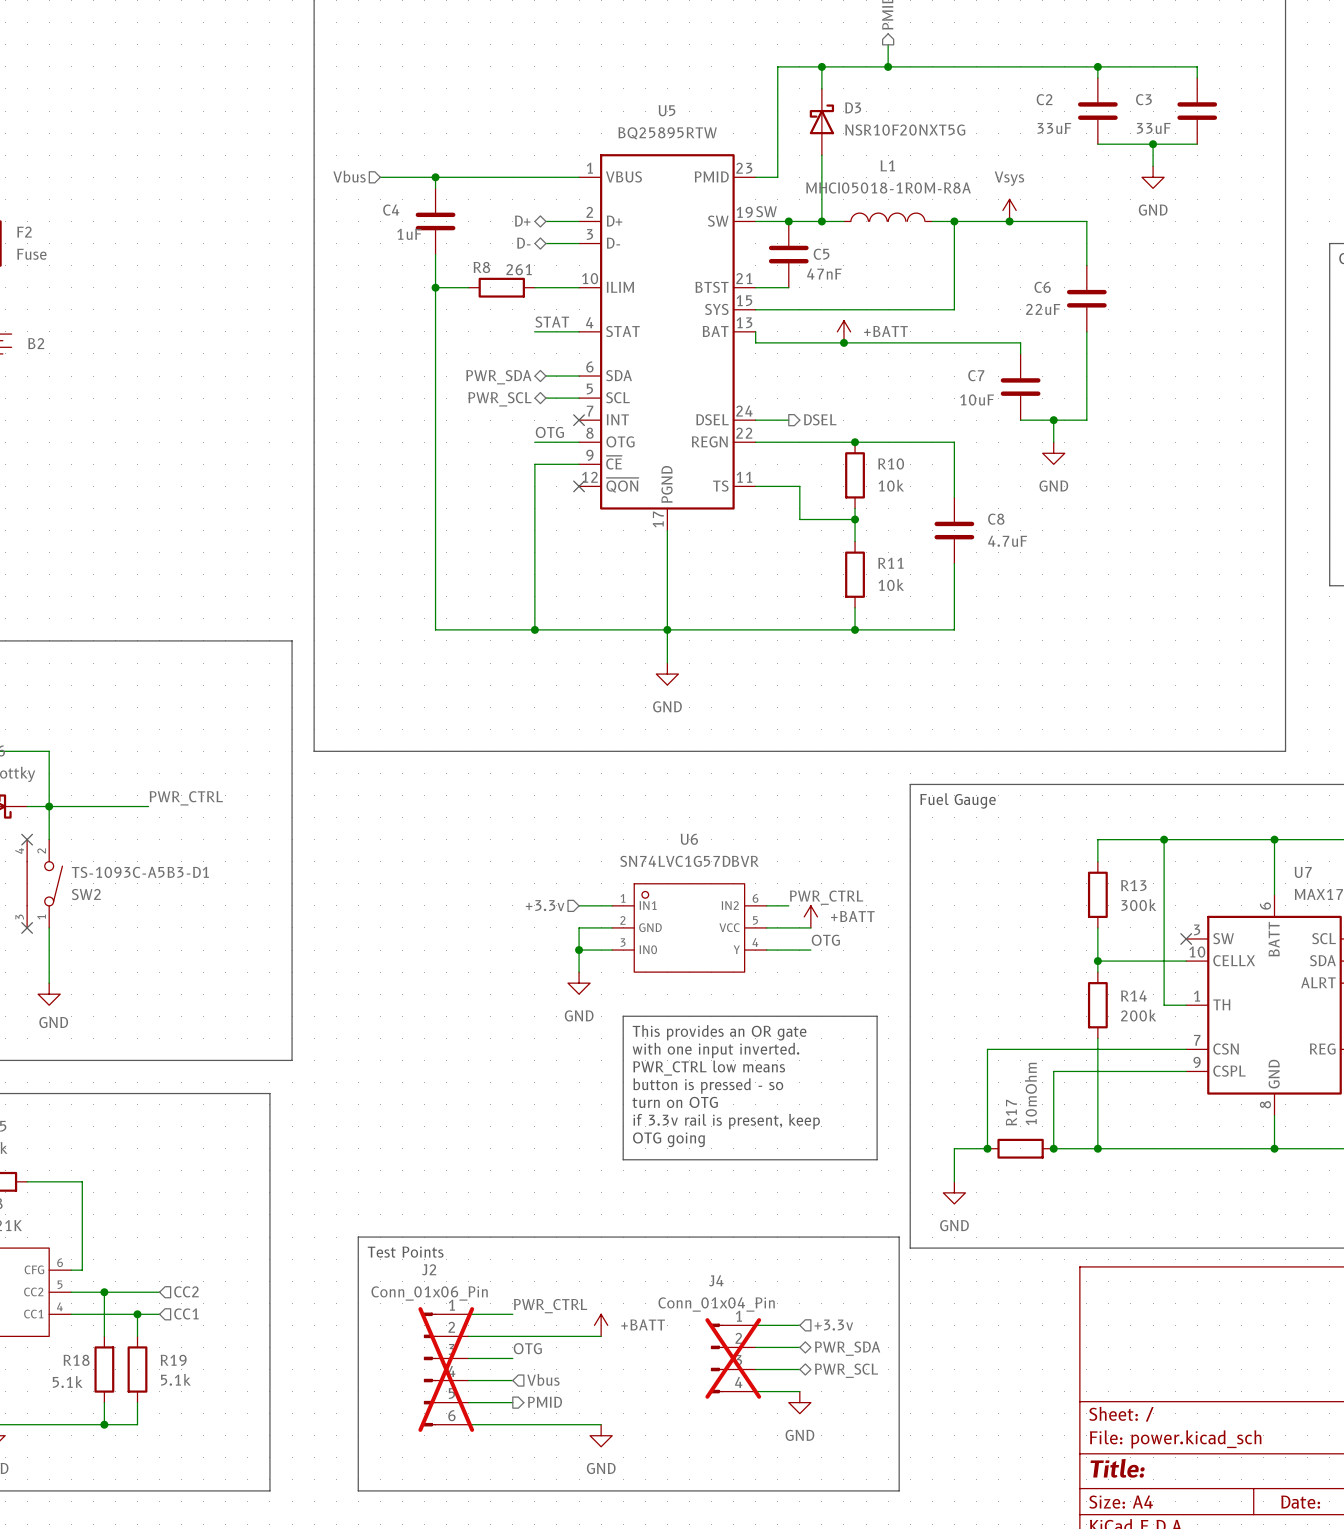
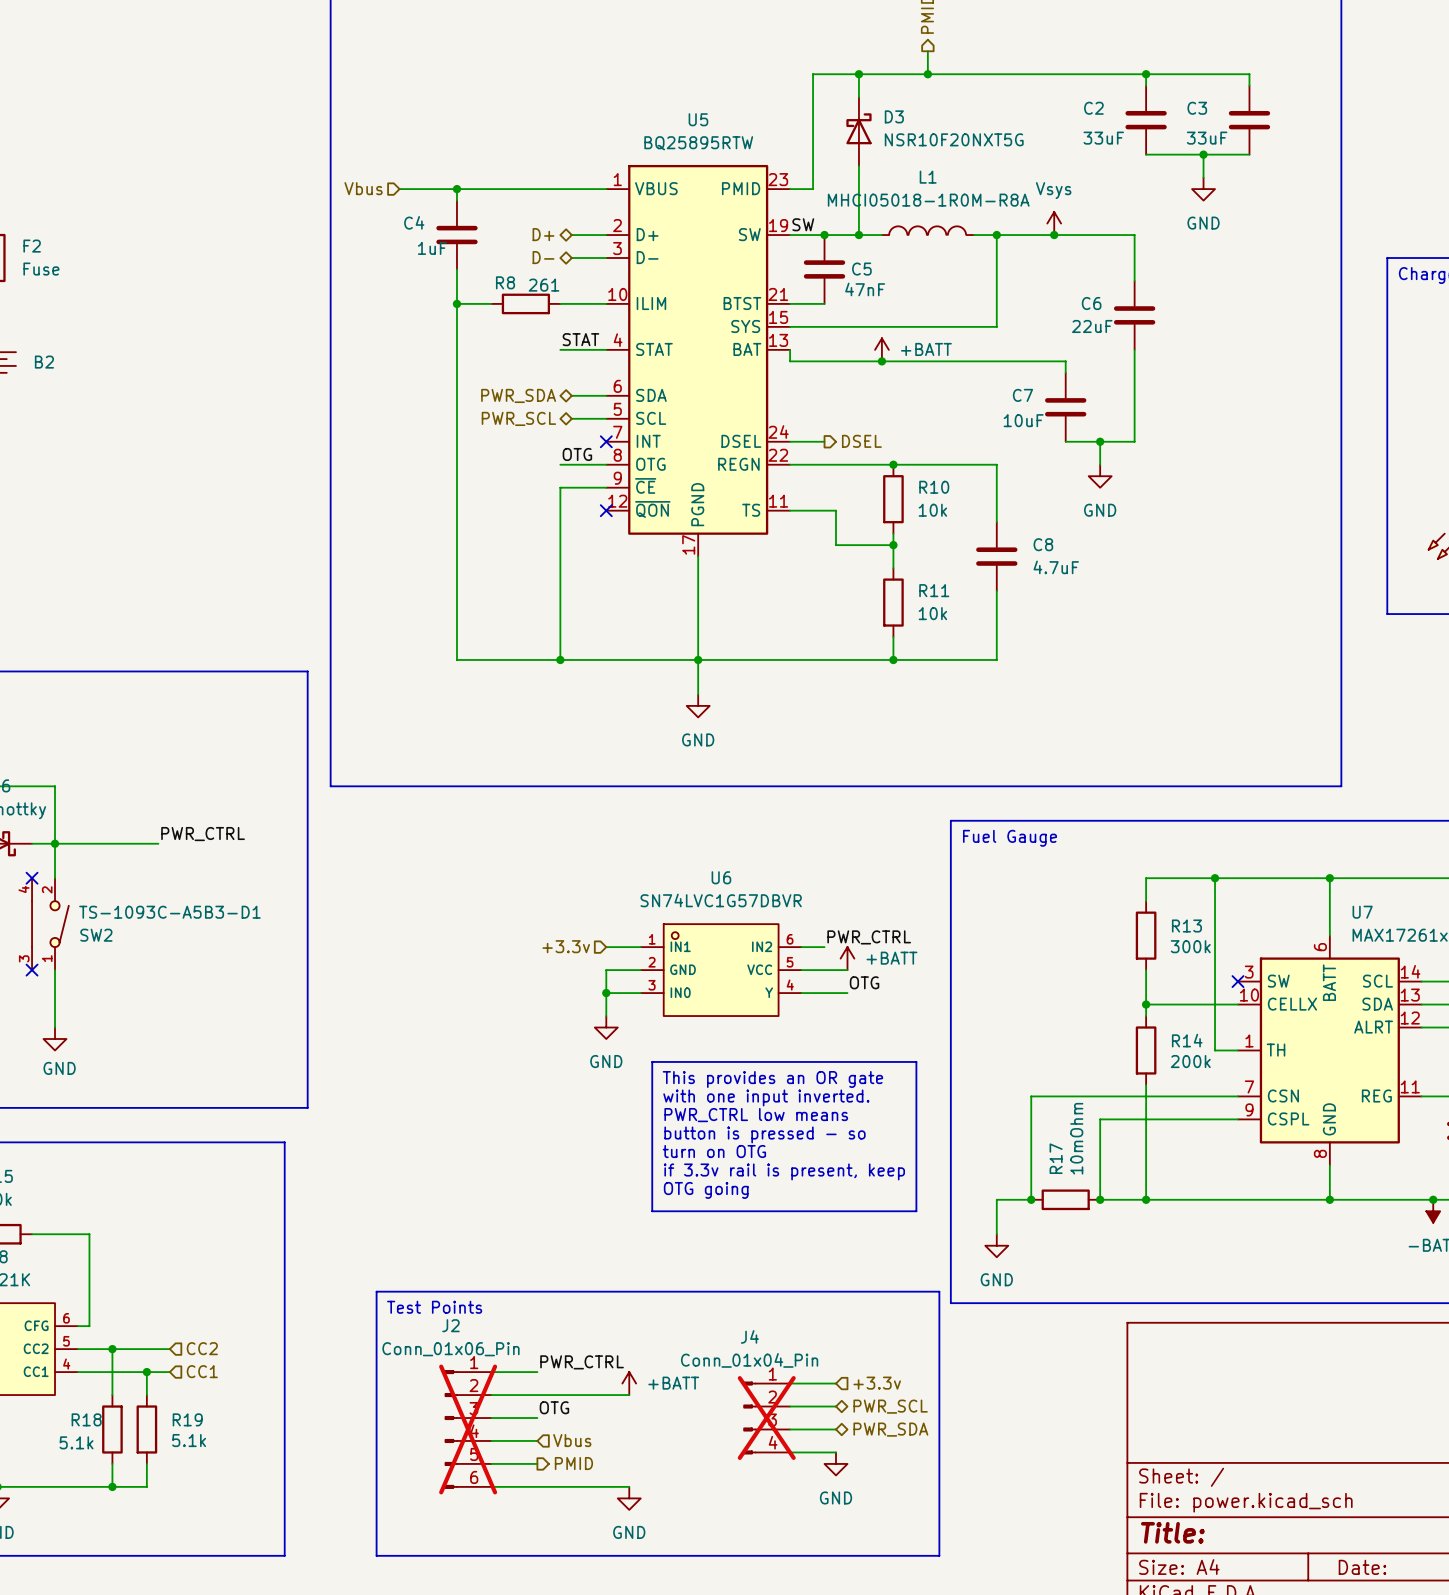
hierarchical label: PWR_SDA (847, 1348) -> PWR_SCL (890, 1406)
hierarchical label: PWR_SCL (846, 1370) -> PWR_SDA (890, 1429)

